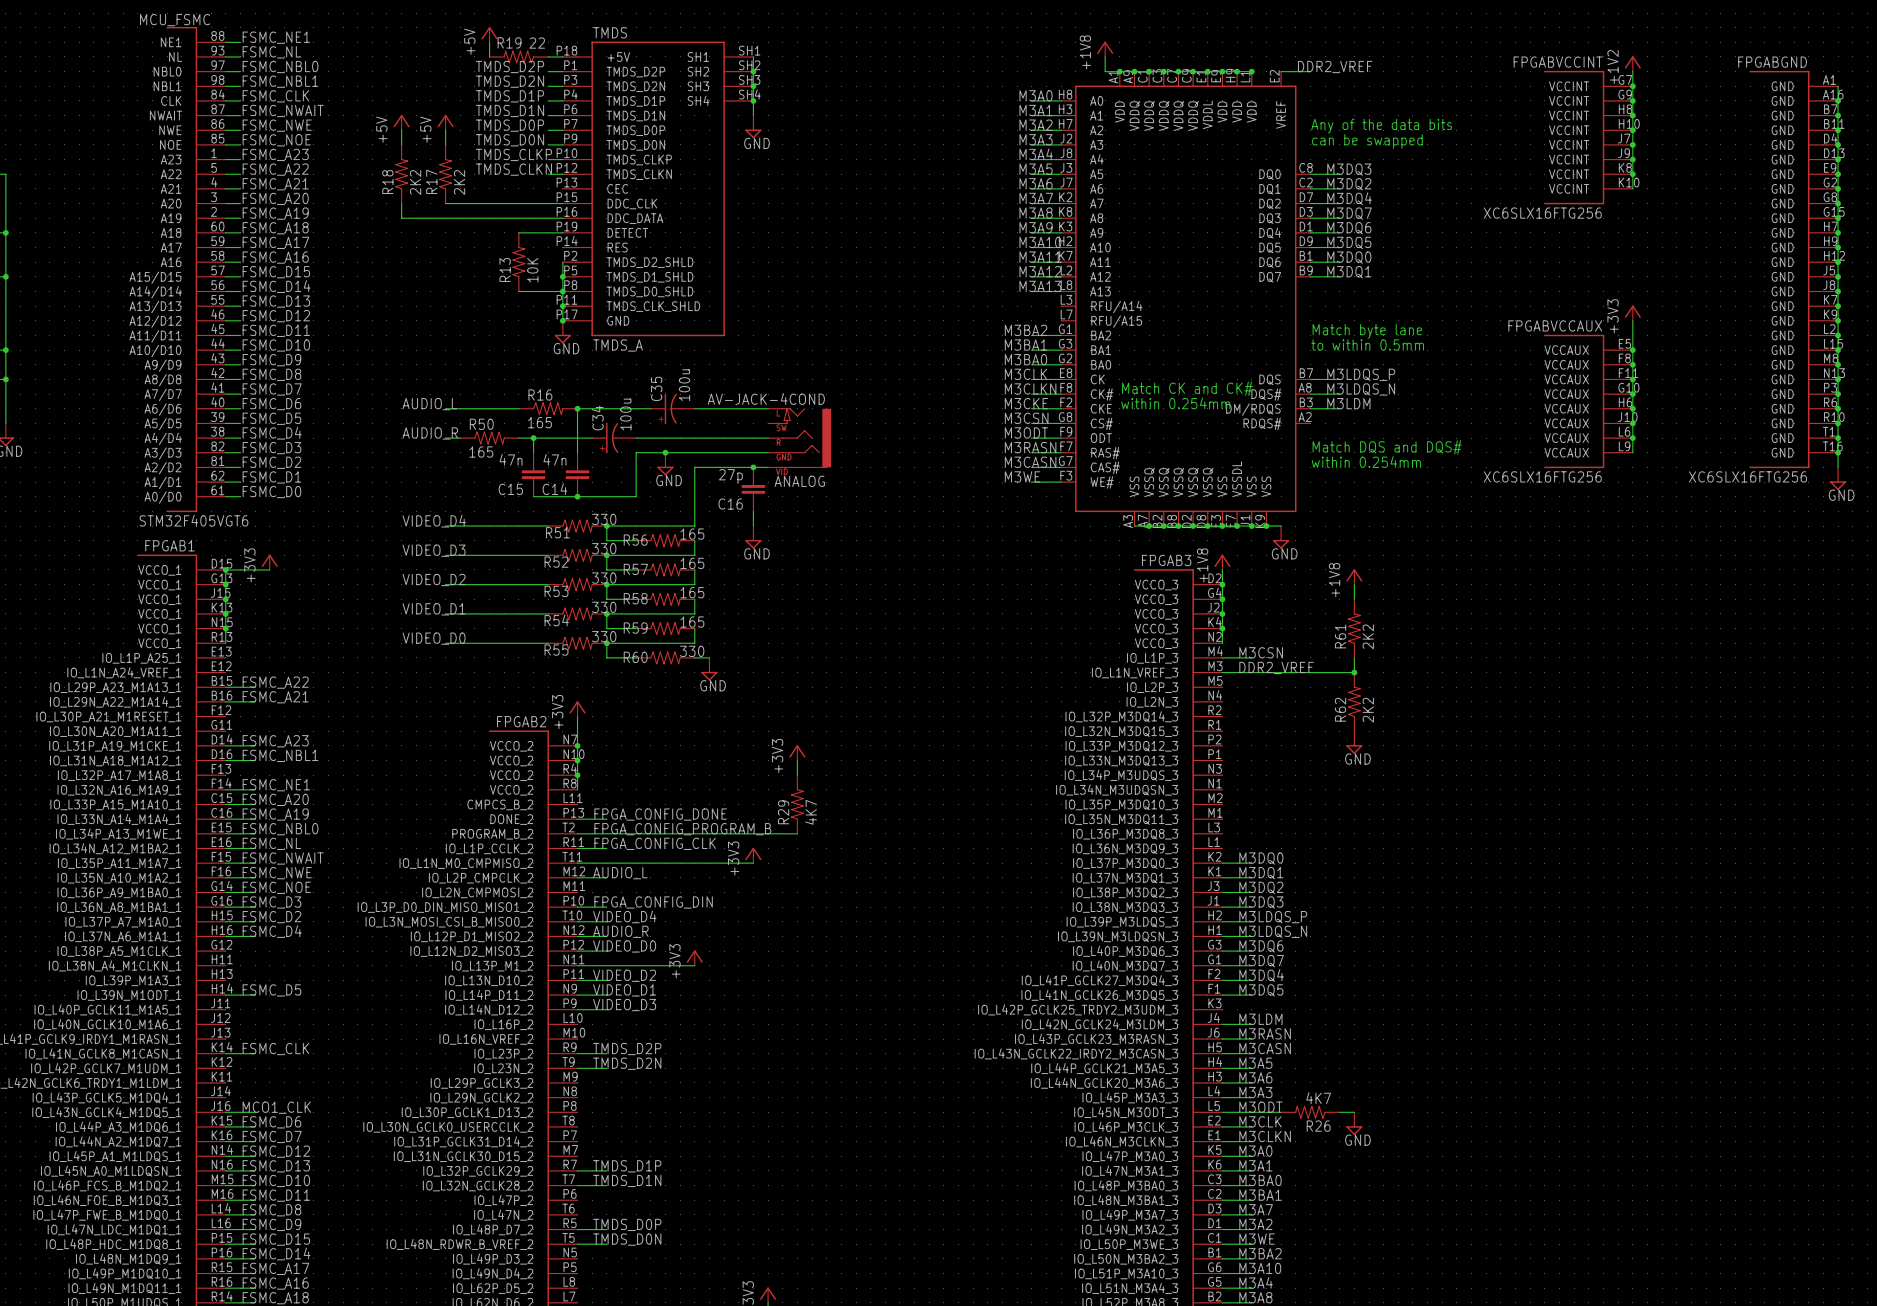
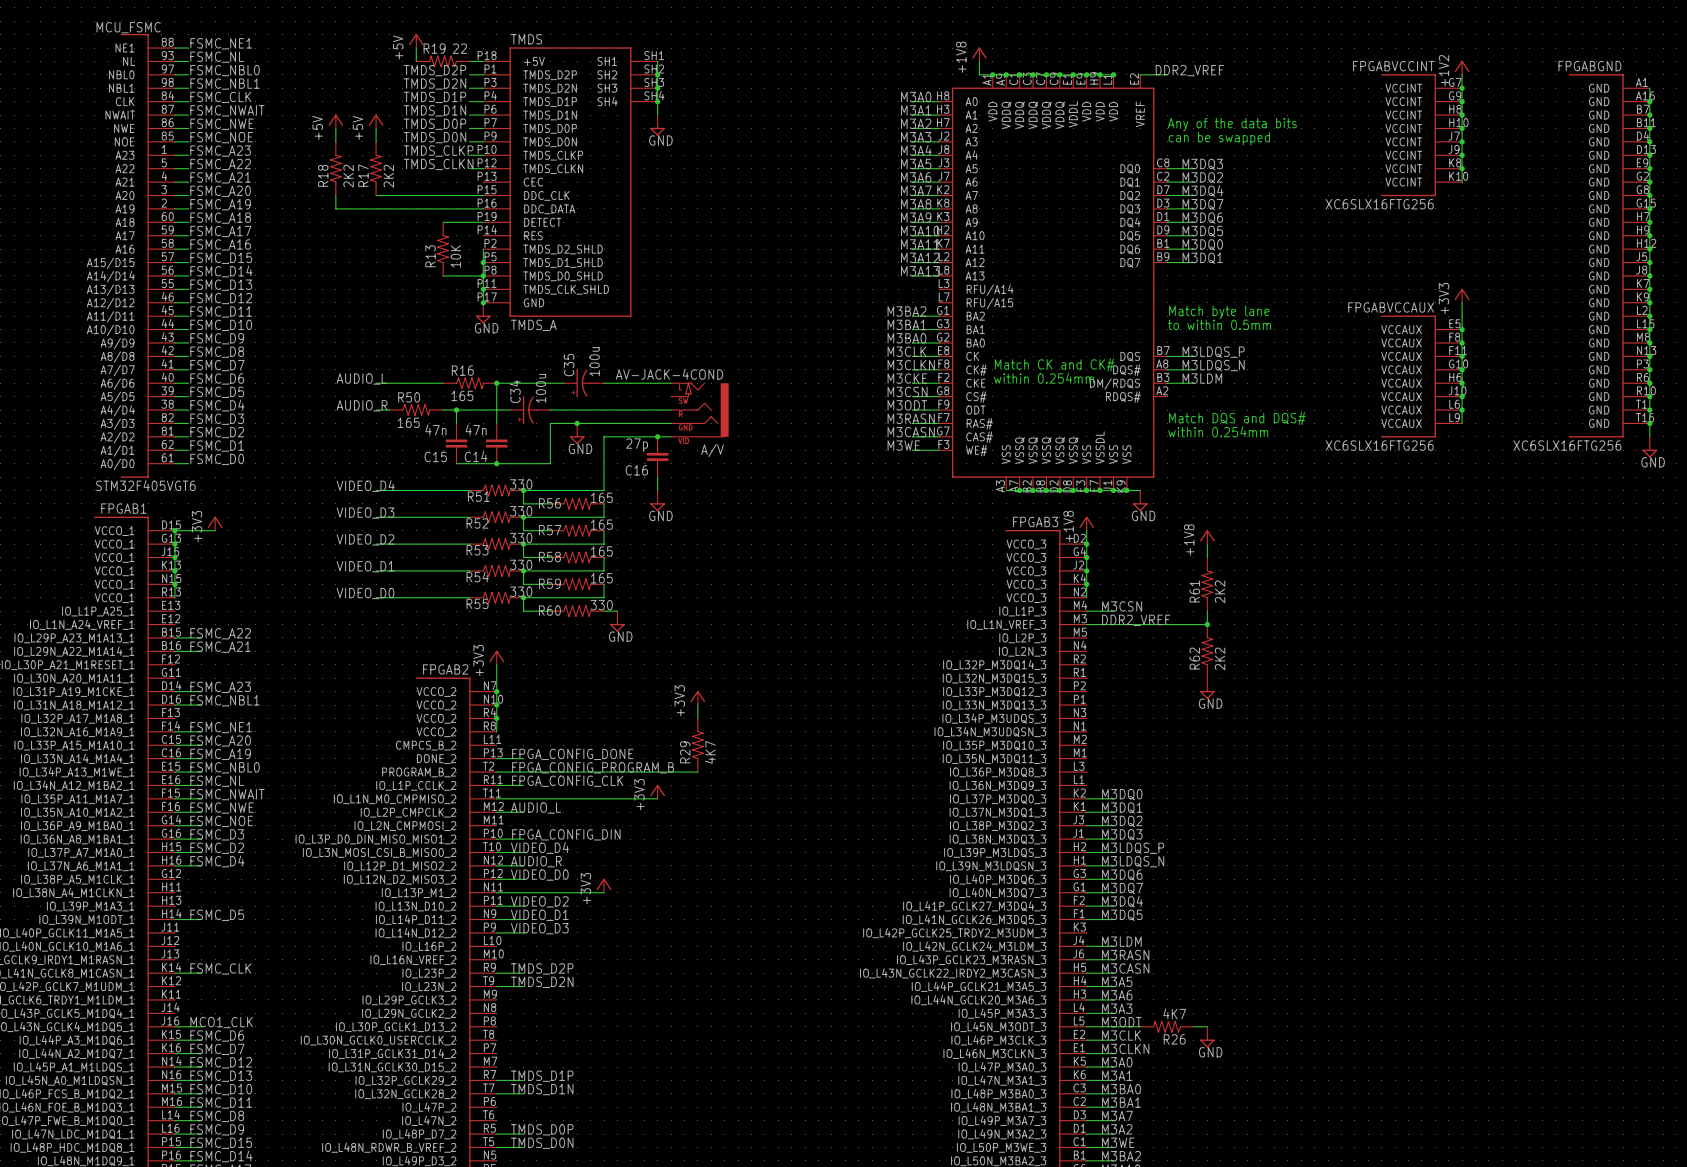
ANALOG name: ANALOG (799, 481) -> A/V (712, 450)

